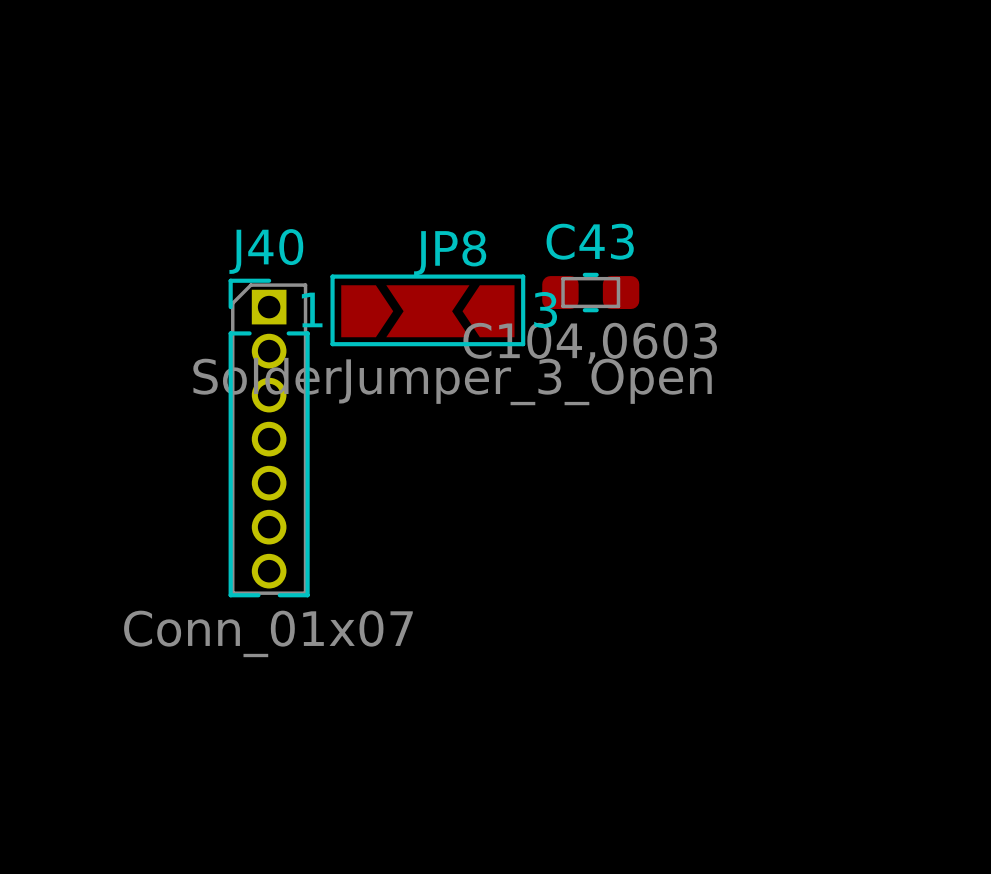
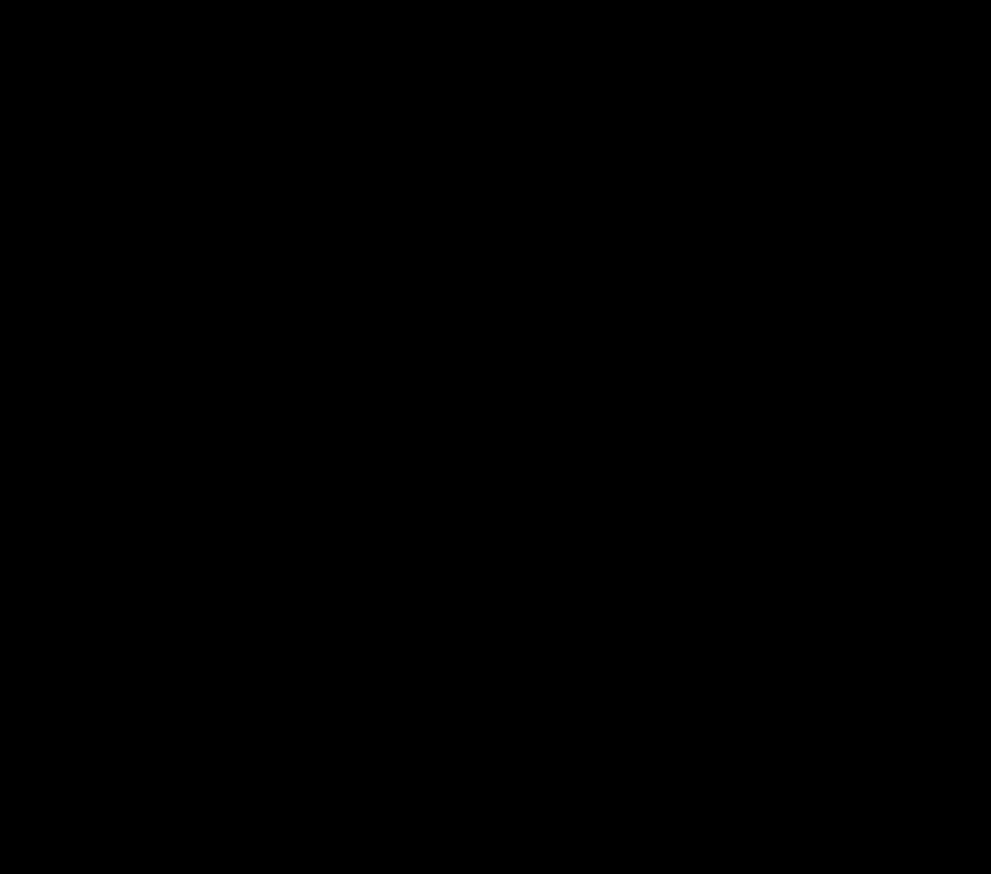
C43: C104,0603 (590, 292) -> none
JP8: SolderJumper_3_Open (427, 310) -> none
J40: Conn_01x07 (269, 438) -> none

